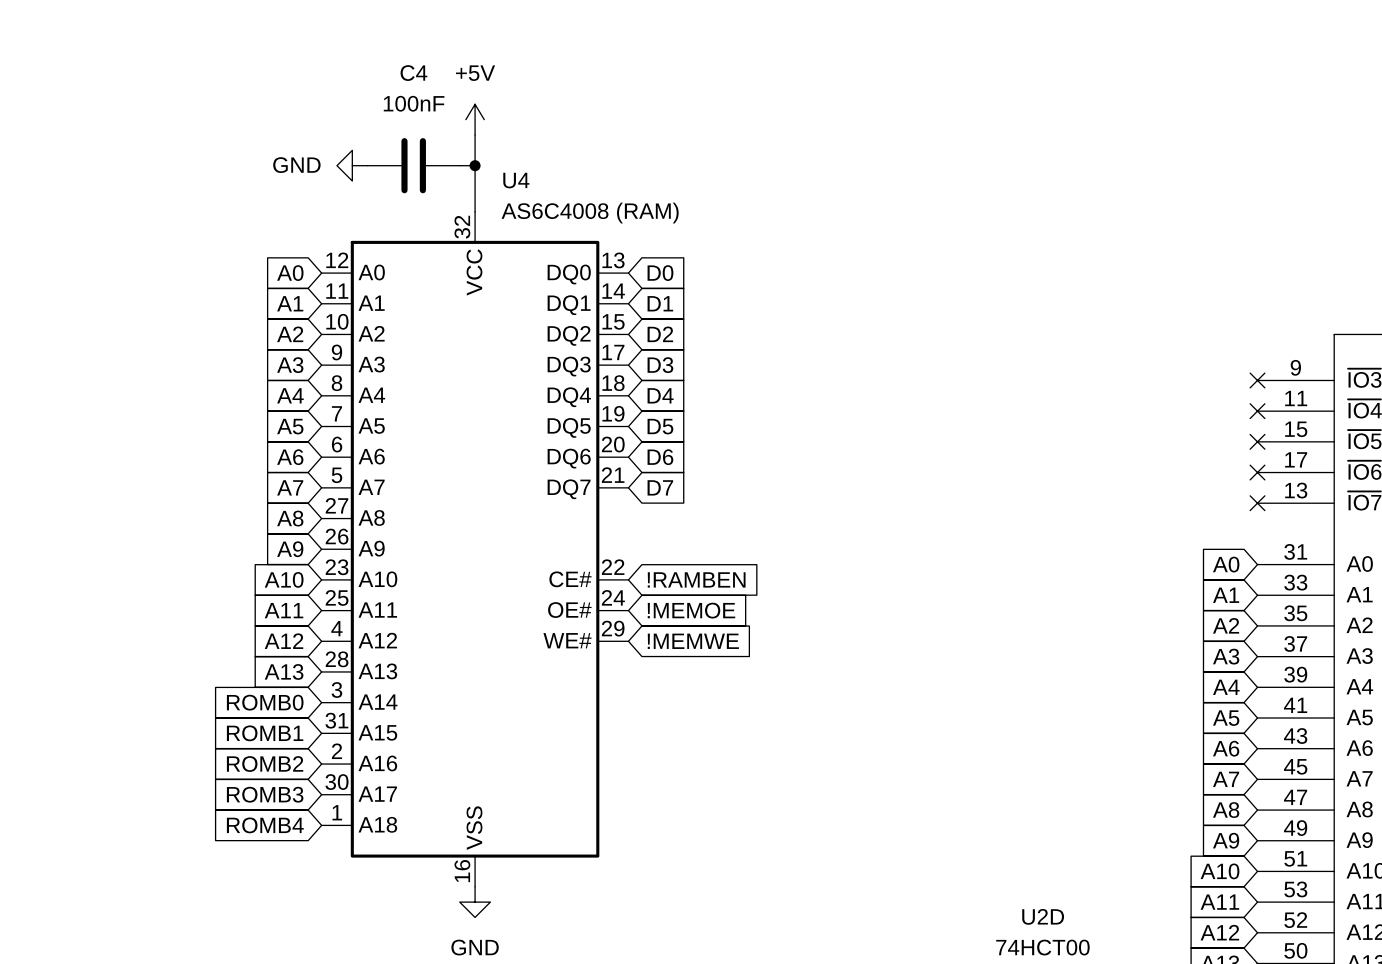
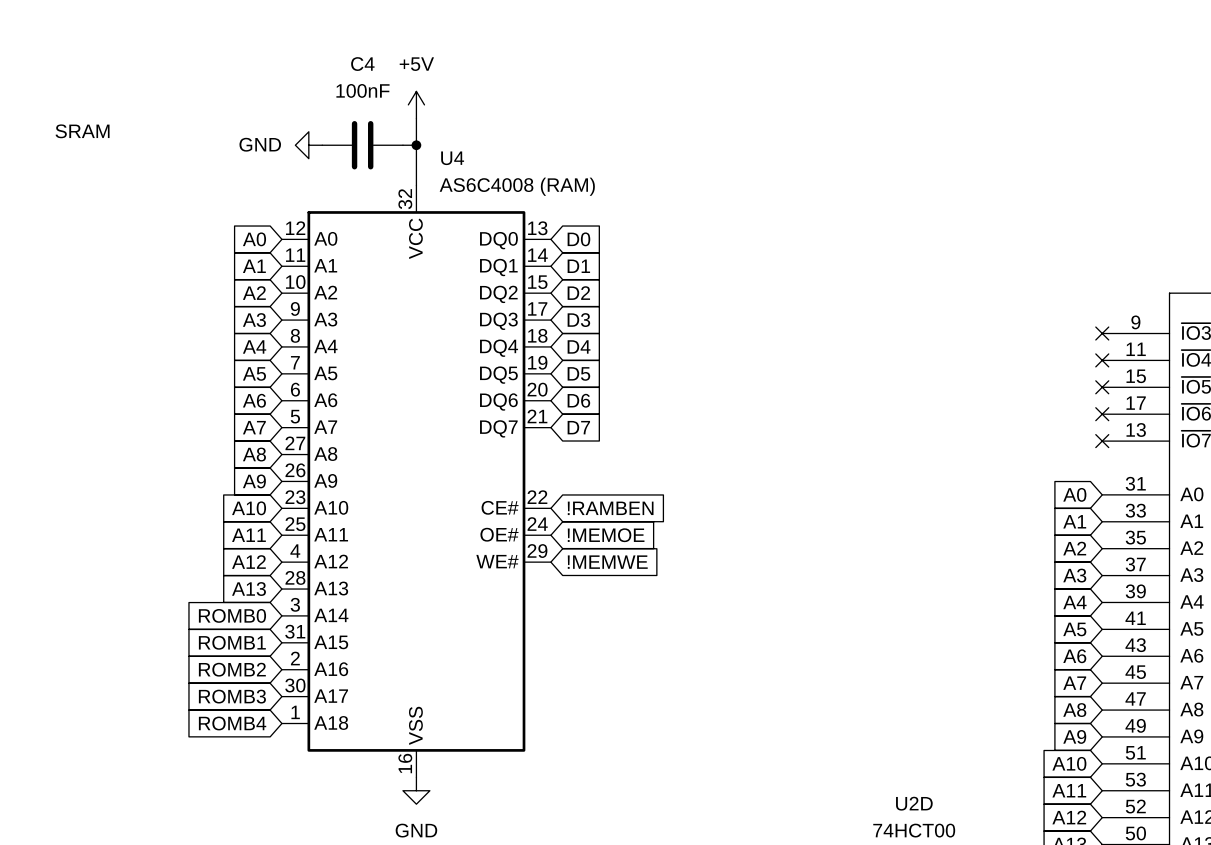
text: none -> SRAM (82, 131)

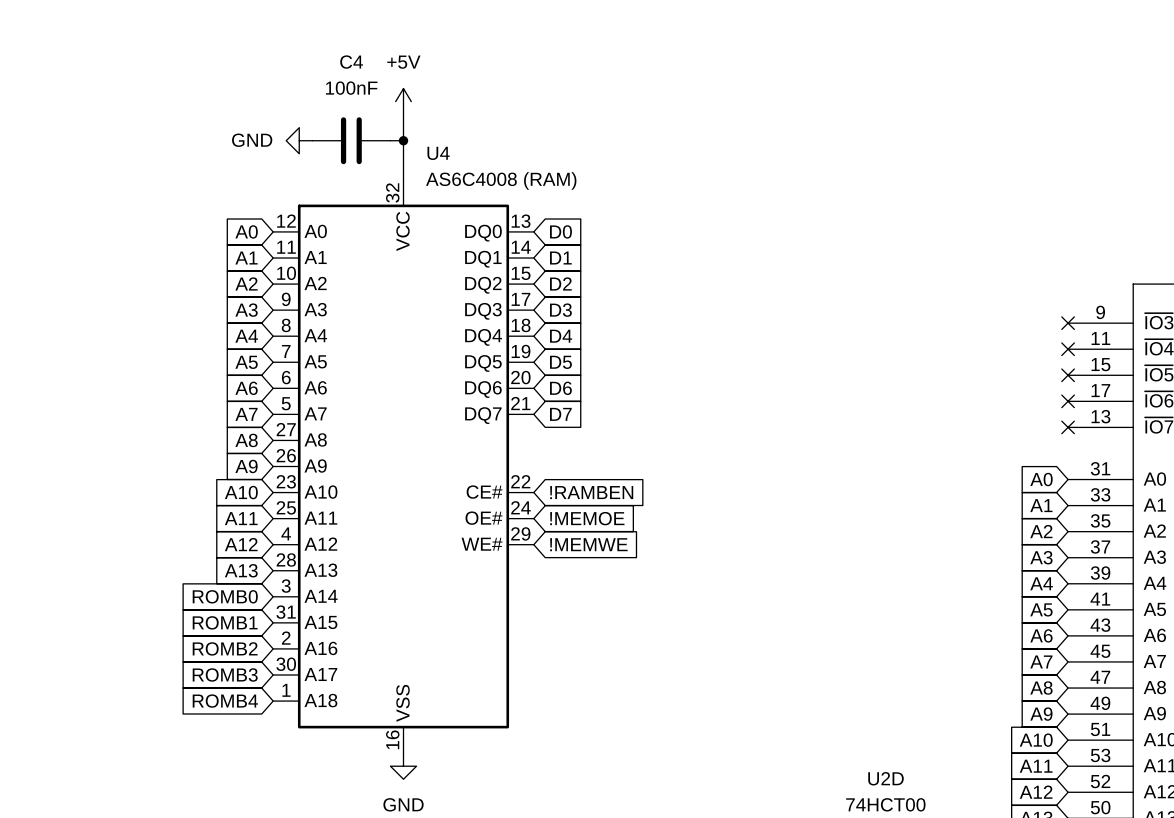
text: SRAM (82, 131) -> none

